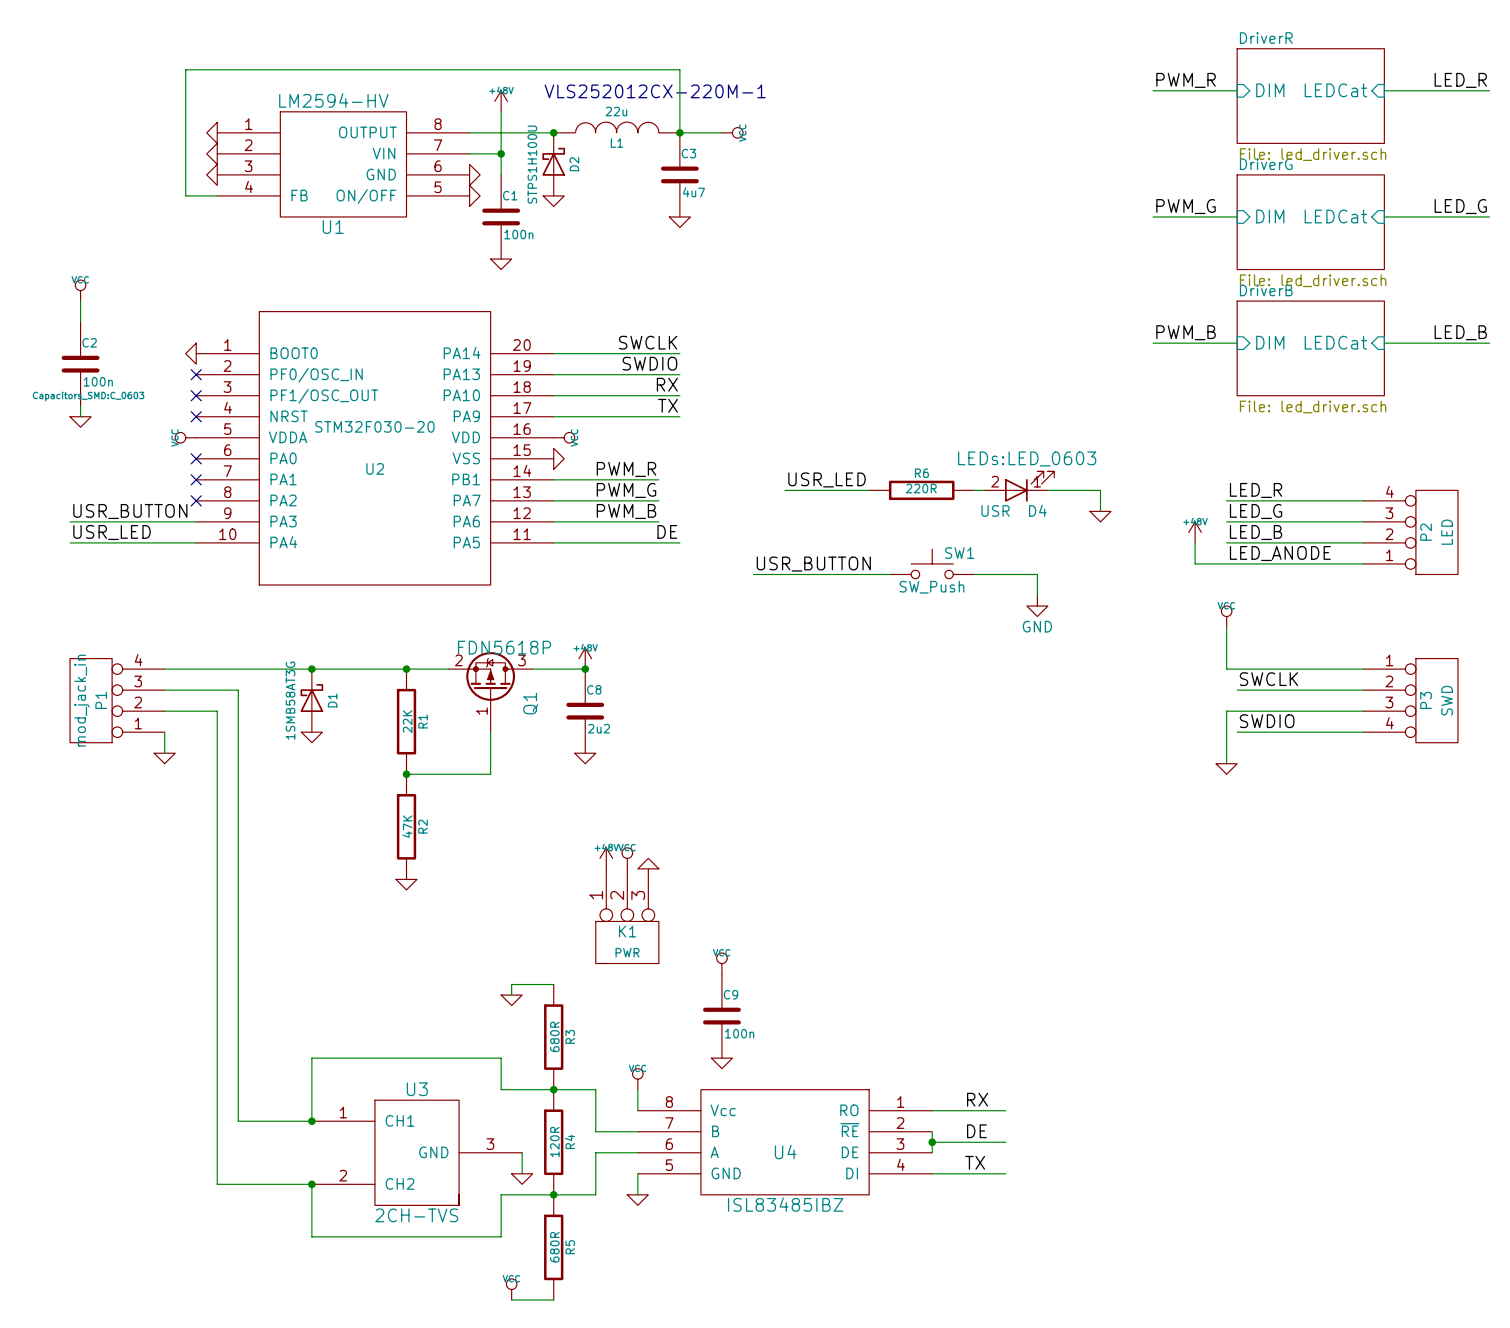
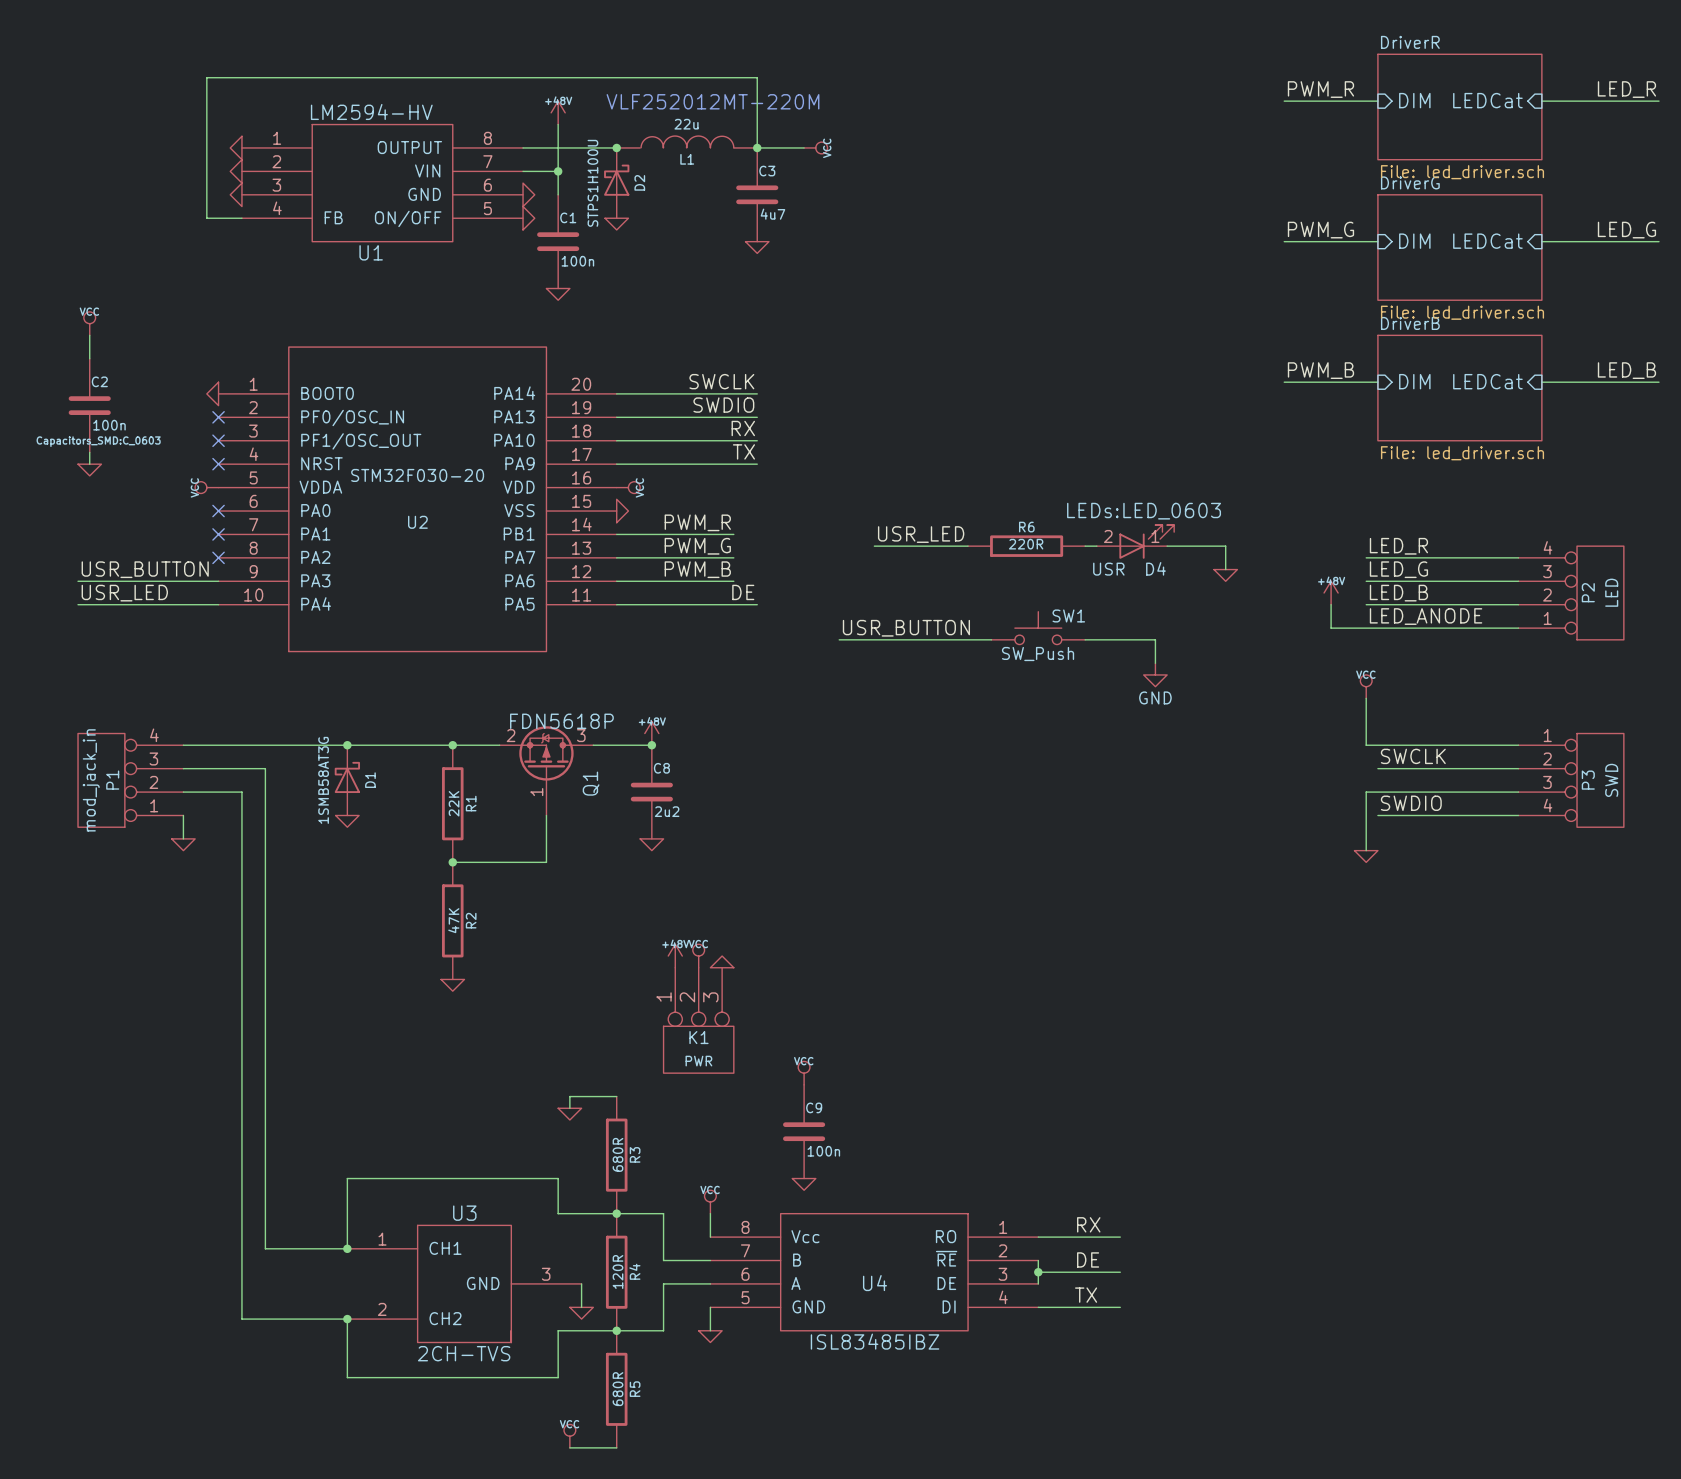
text: VLS252012CX-220M-1 (655, 91) -> VLF252012MT-220M (713, 101)

